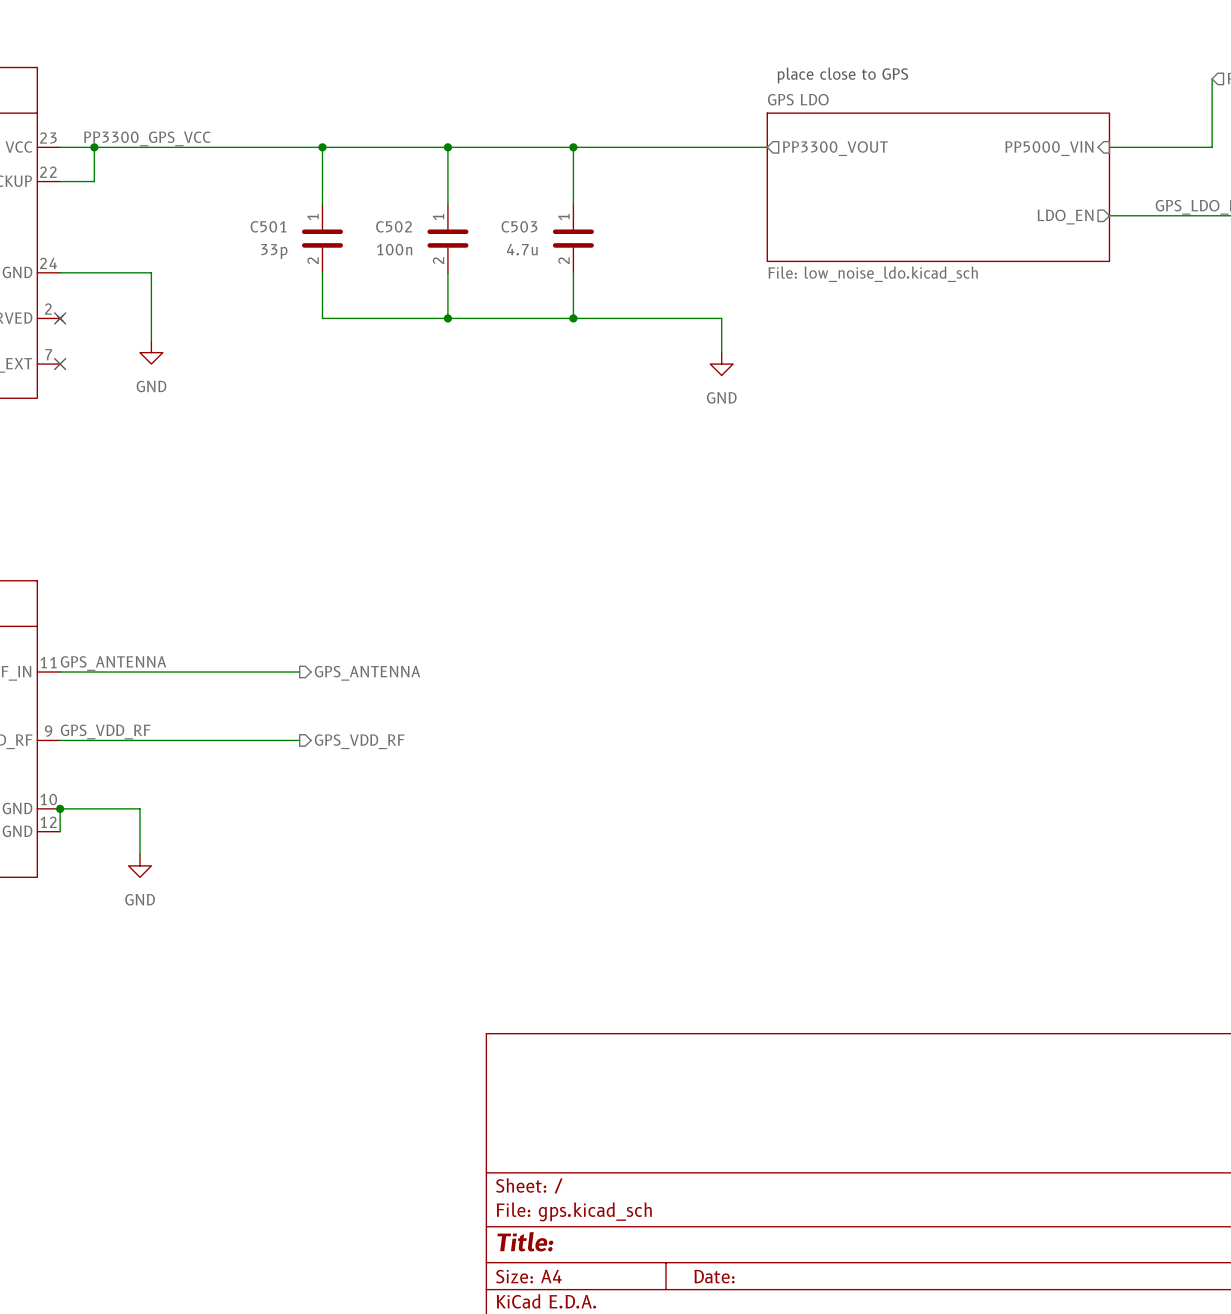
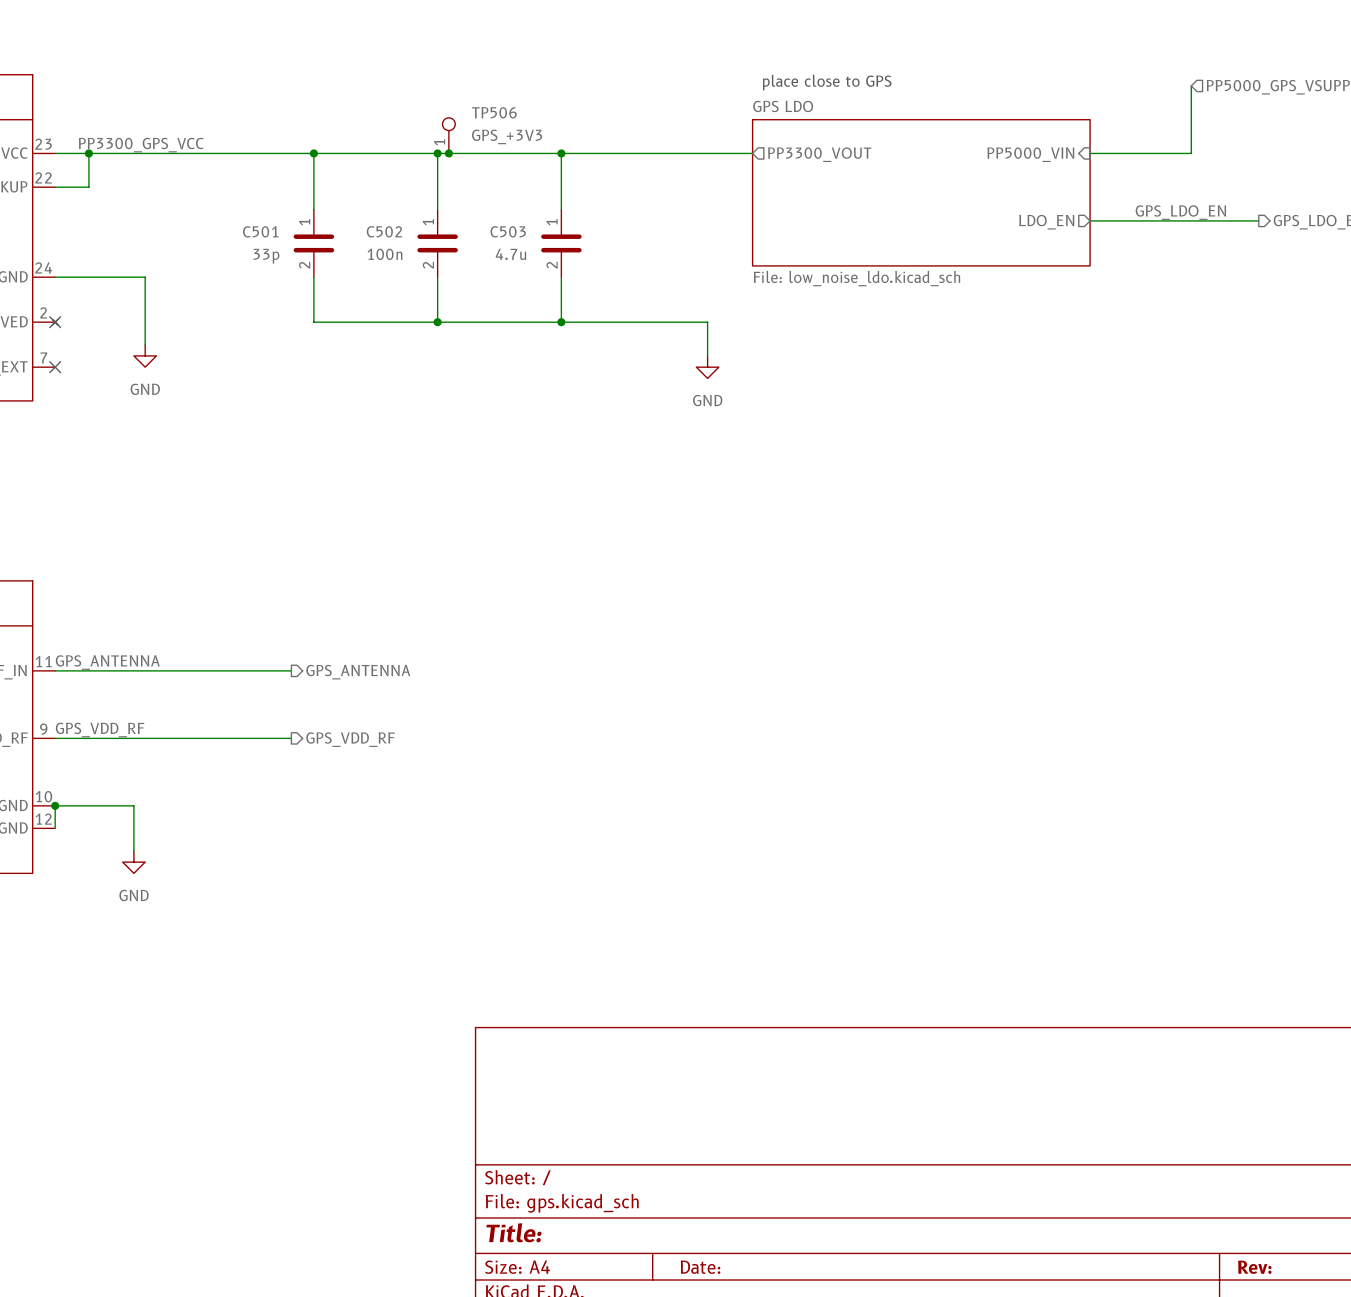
TP506: none -> GPS_+3V3 (448, 135)
junction: none -> (448, 153)

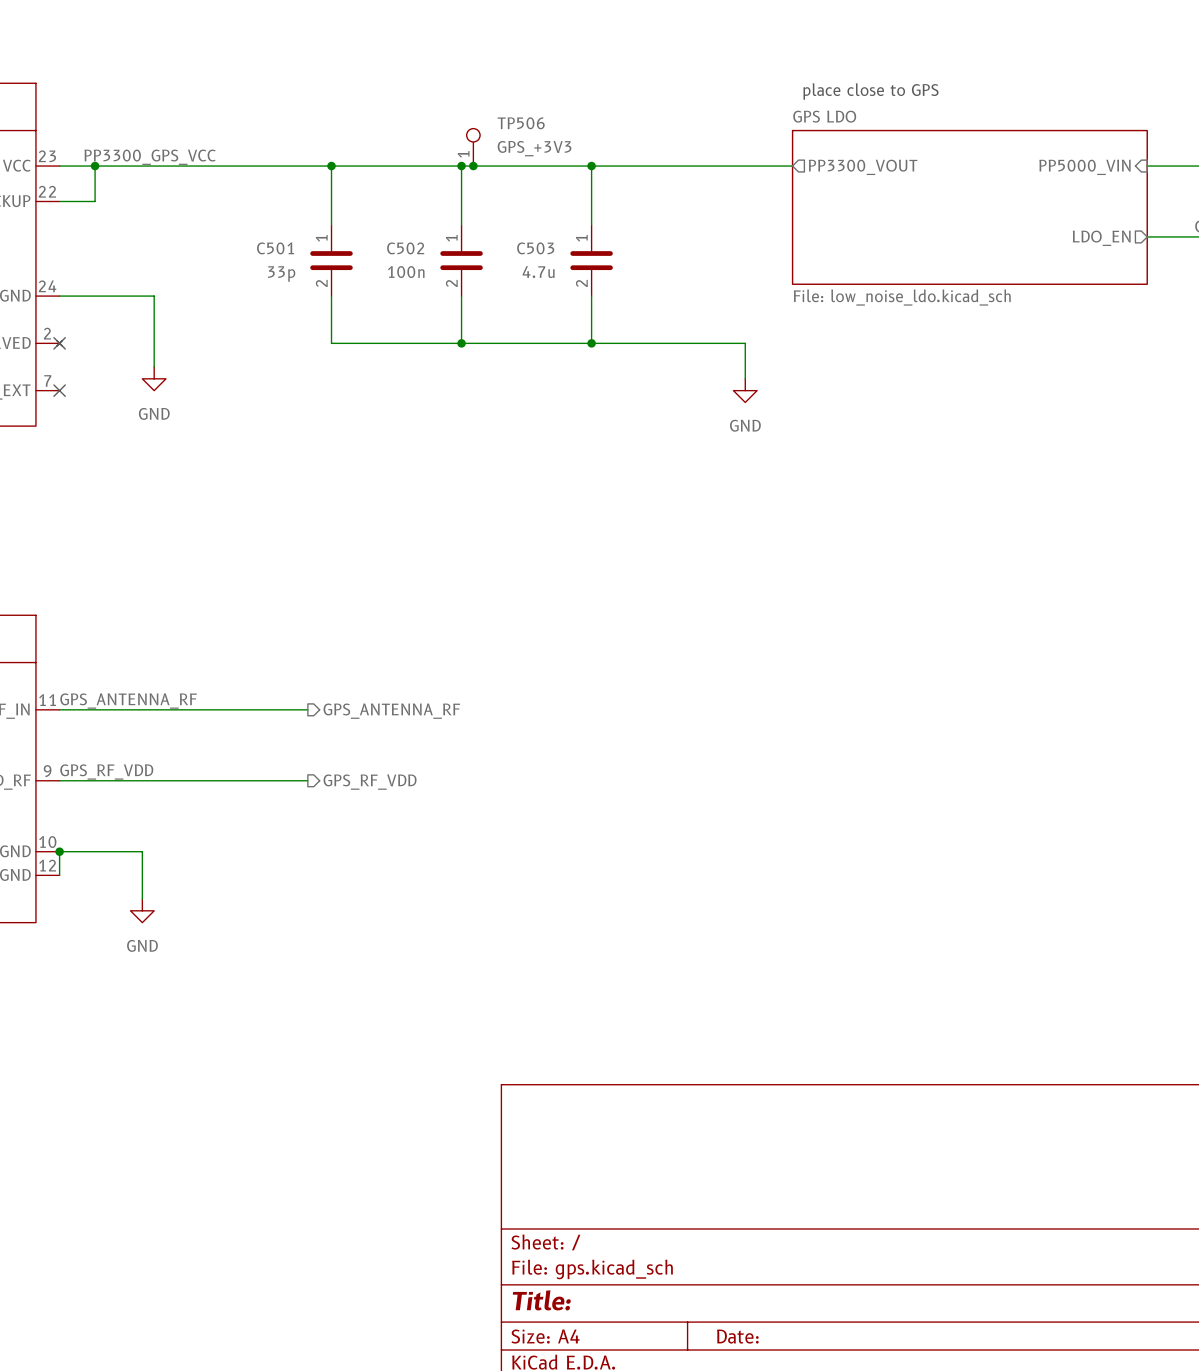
label: GPS_ANTENNA (107, 662) -> GPS_ANTENNA_RF (128, 701)
hierarchical label: GPS_ANTENNA (358, 672) -> GPS_ANTENNA_RF (391, 711)
label: GPS_VDD_RF (100, 730) -> GPS_RF_VDD (106, 771)
hierarchical label: GPS_VDD_RF (350, 739) -> GPS_RF_VDD (370, 782)

